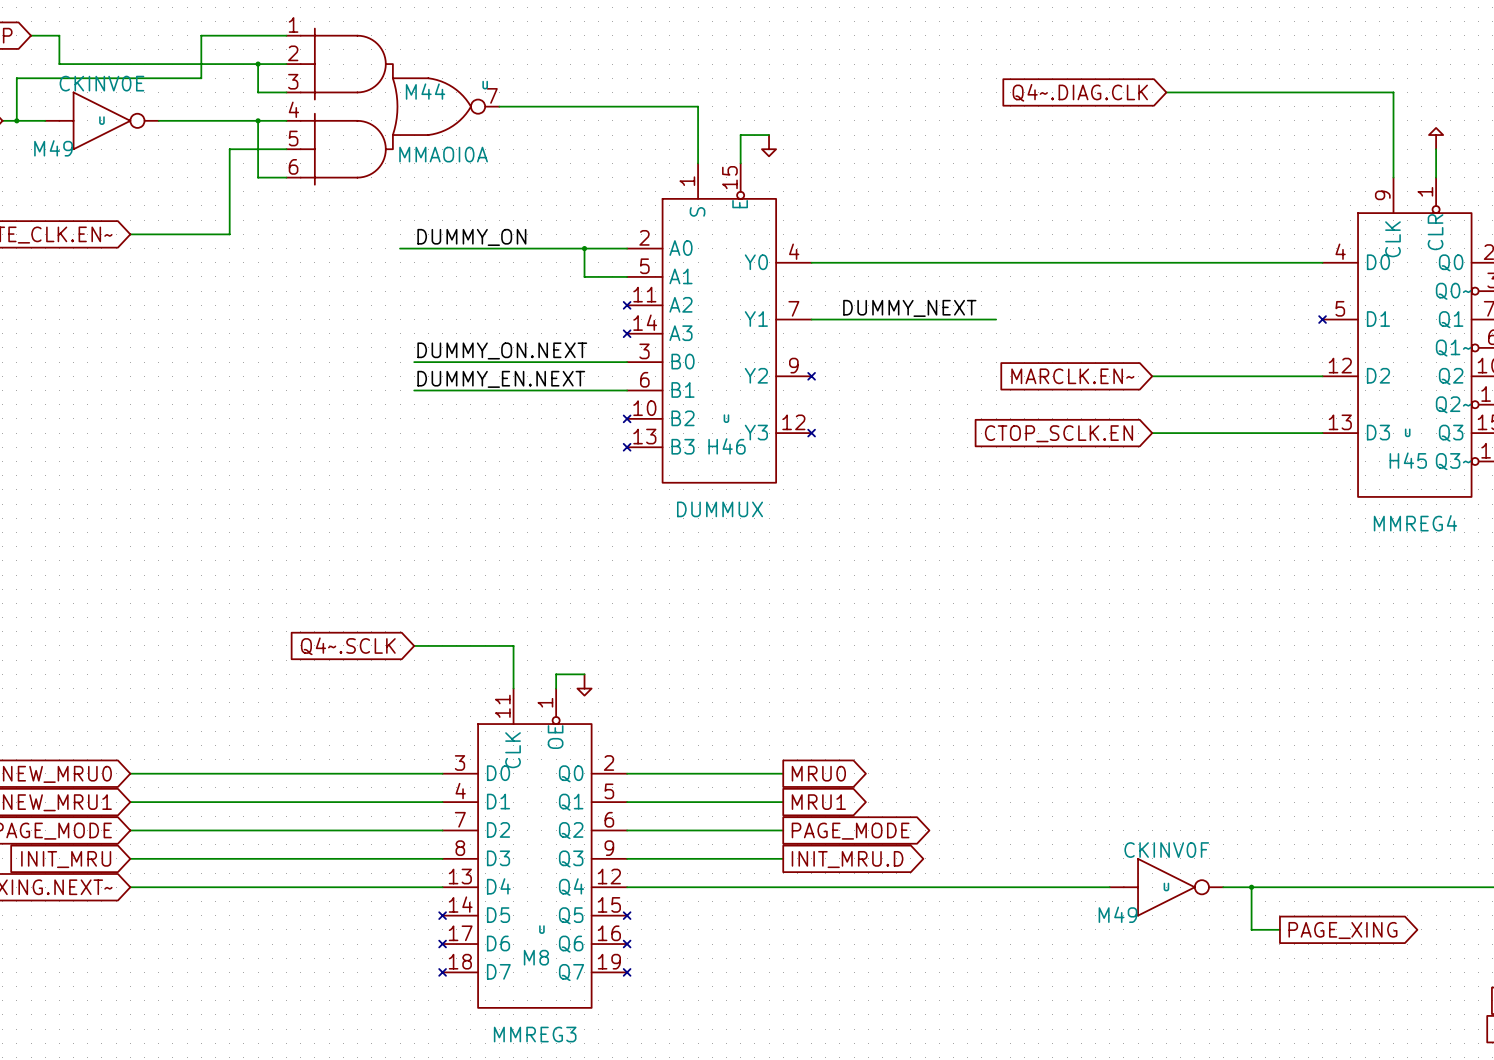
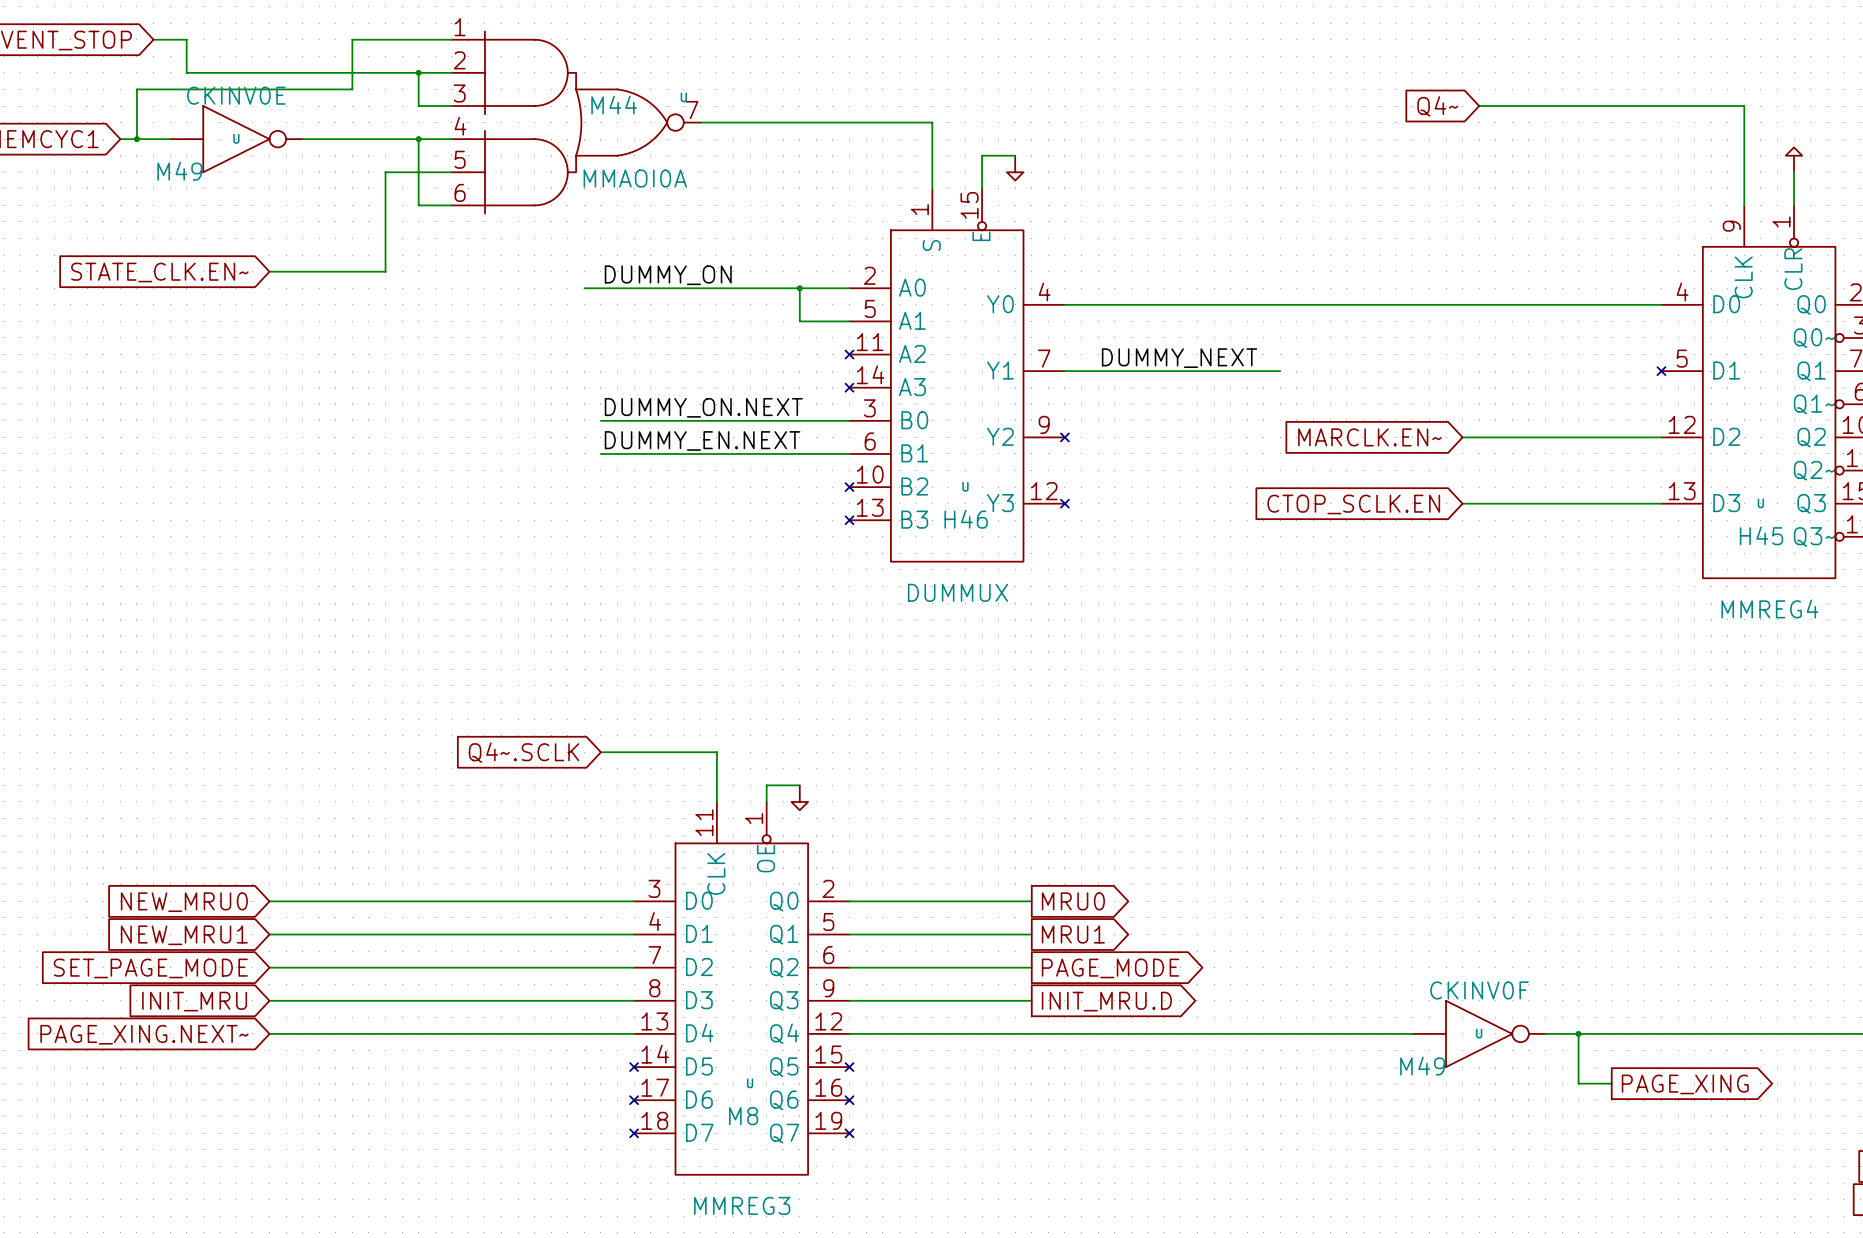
global label: Q4~.DIAG.CLK (1080, 92) -> Q4~ (1437, 106)

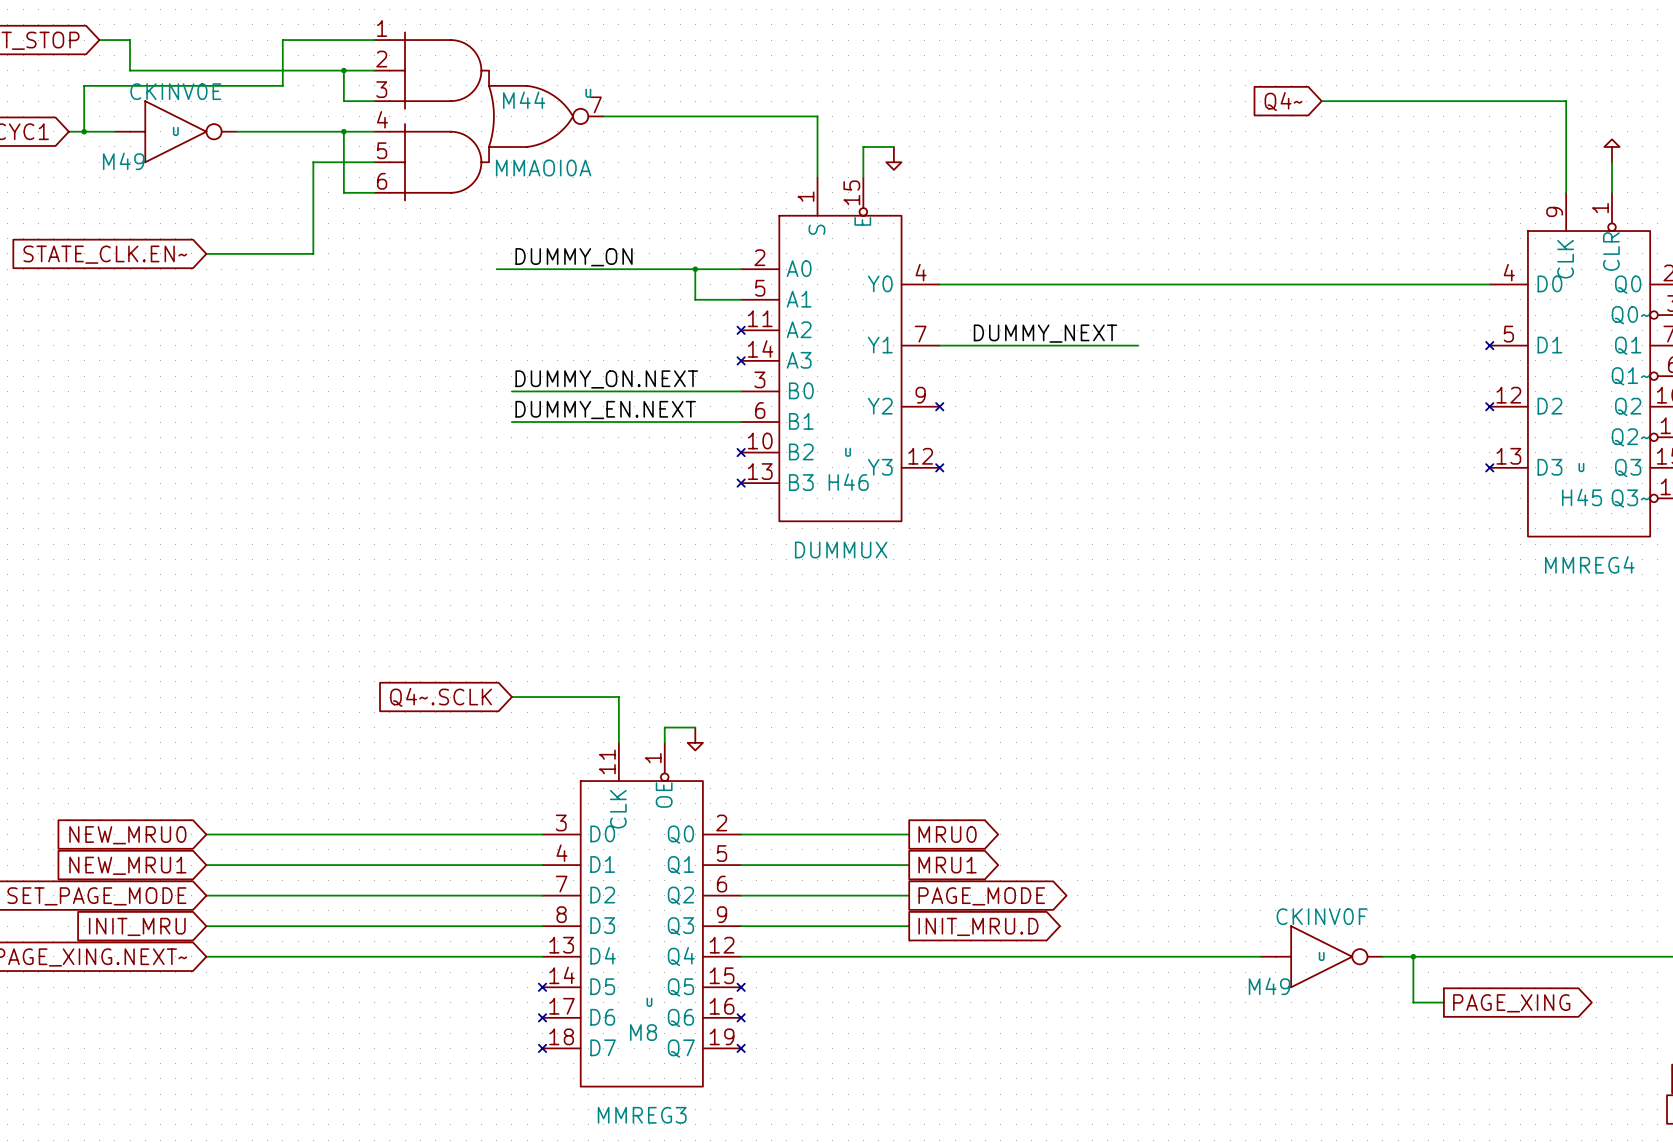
global label: MARCLK.EN~ (1369, 437) -> none
wire: (1462, 437) (1661, 437) -> none
no-connect mark: none -> (1489, 406)
wire: (1462, 503) (1661, 503) -> none
no-connect mark: none -> (1489, 467)
global label: CTOP_SCLK.EN (1353, 504) -> none

